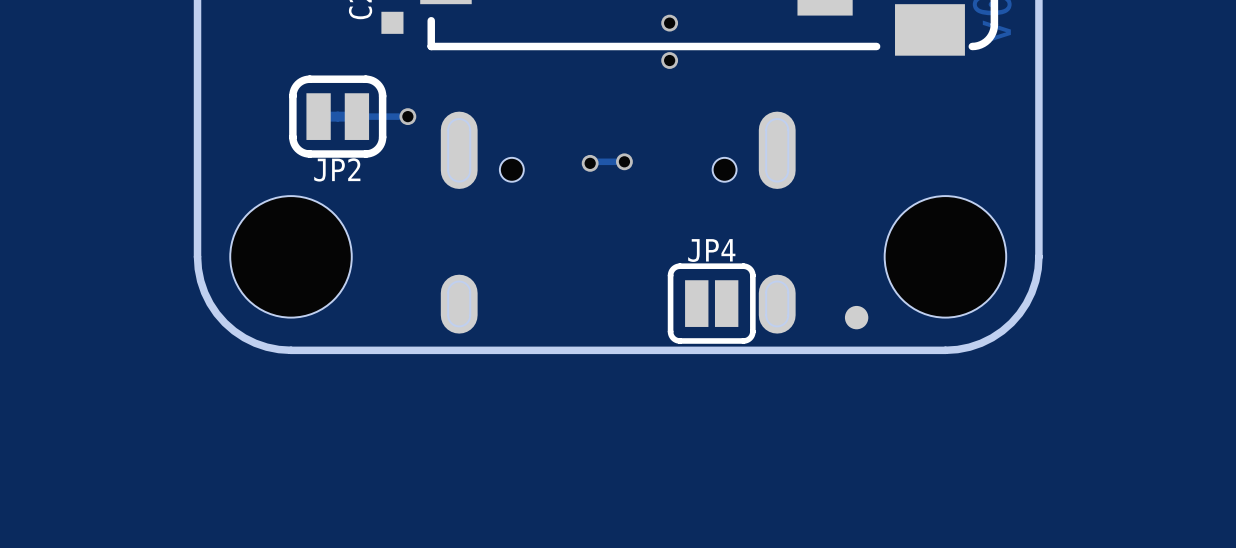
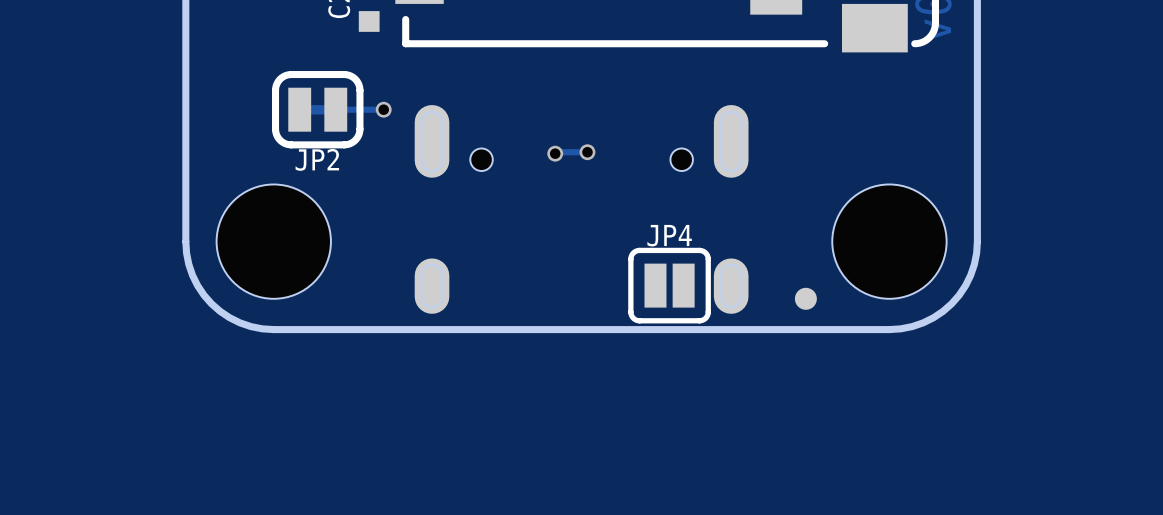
via: (669, 23) -> none
via: (669, 60) -> none

